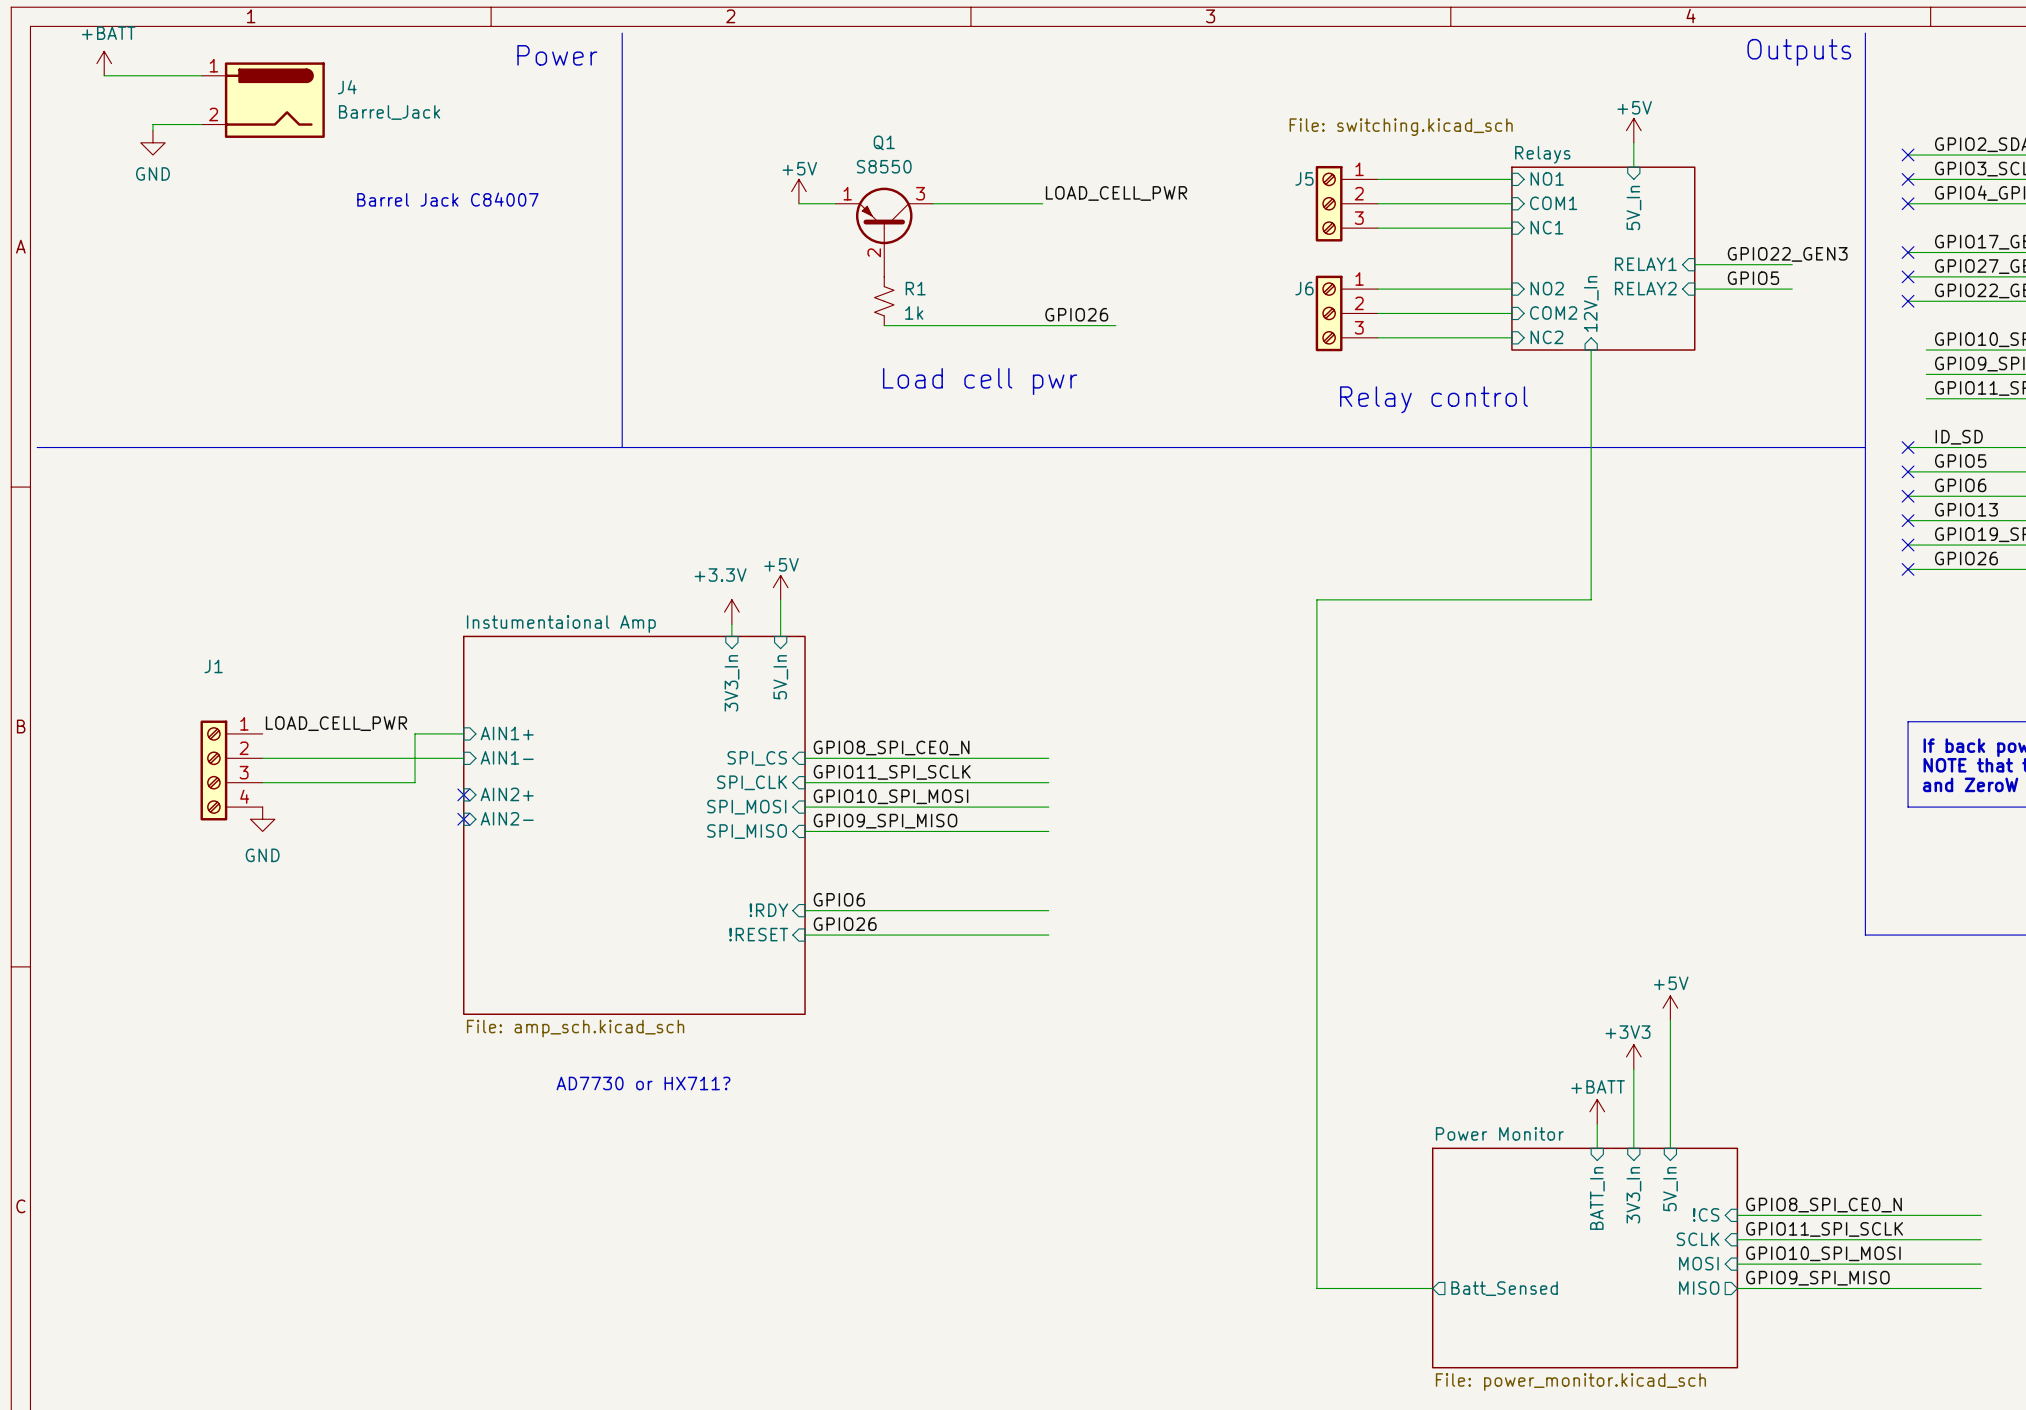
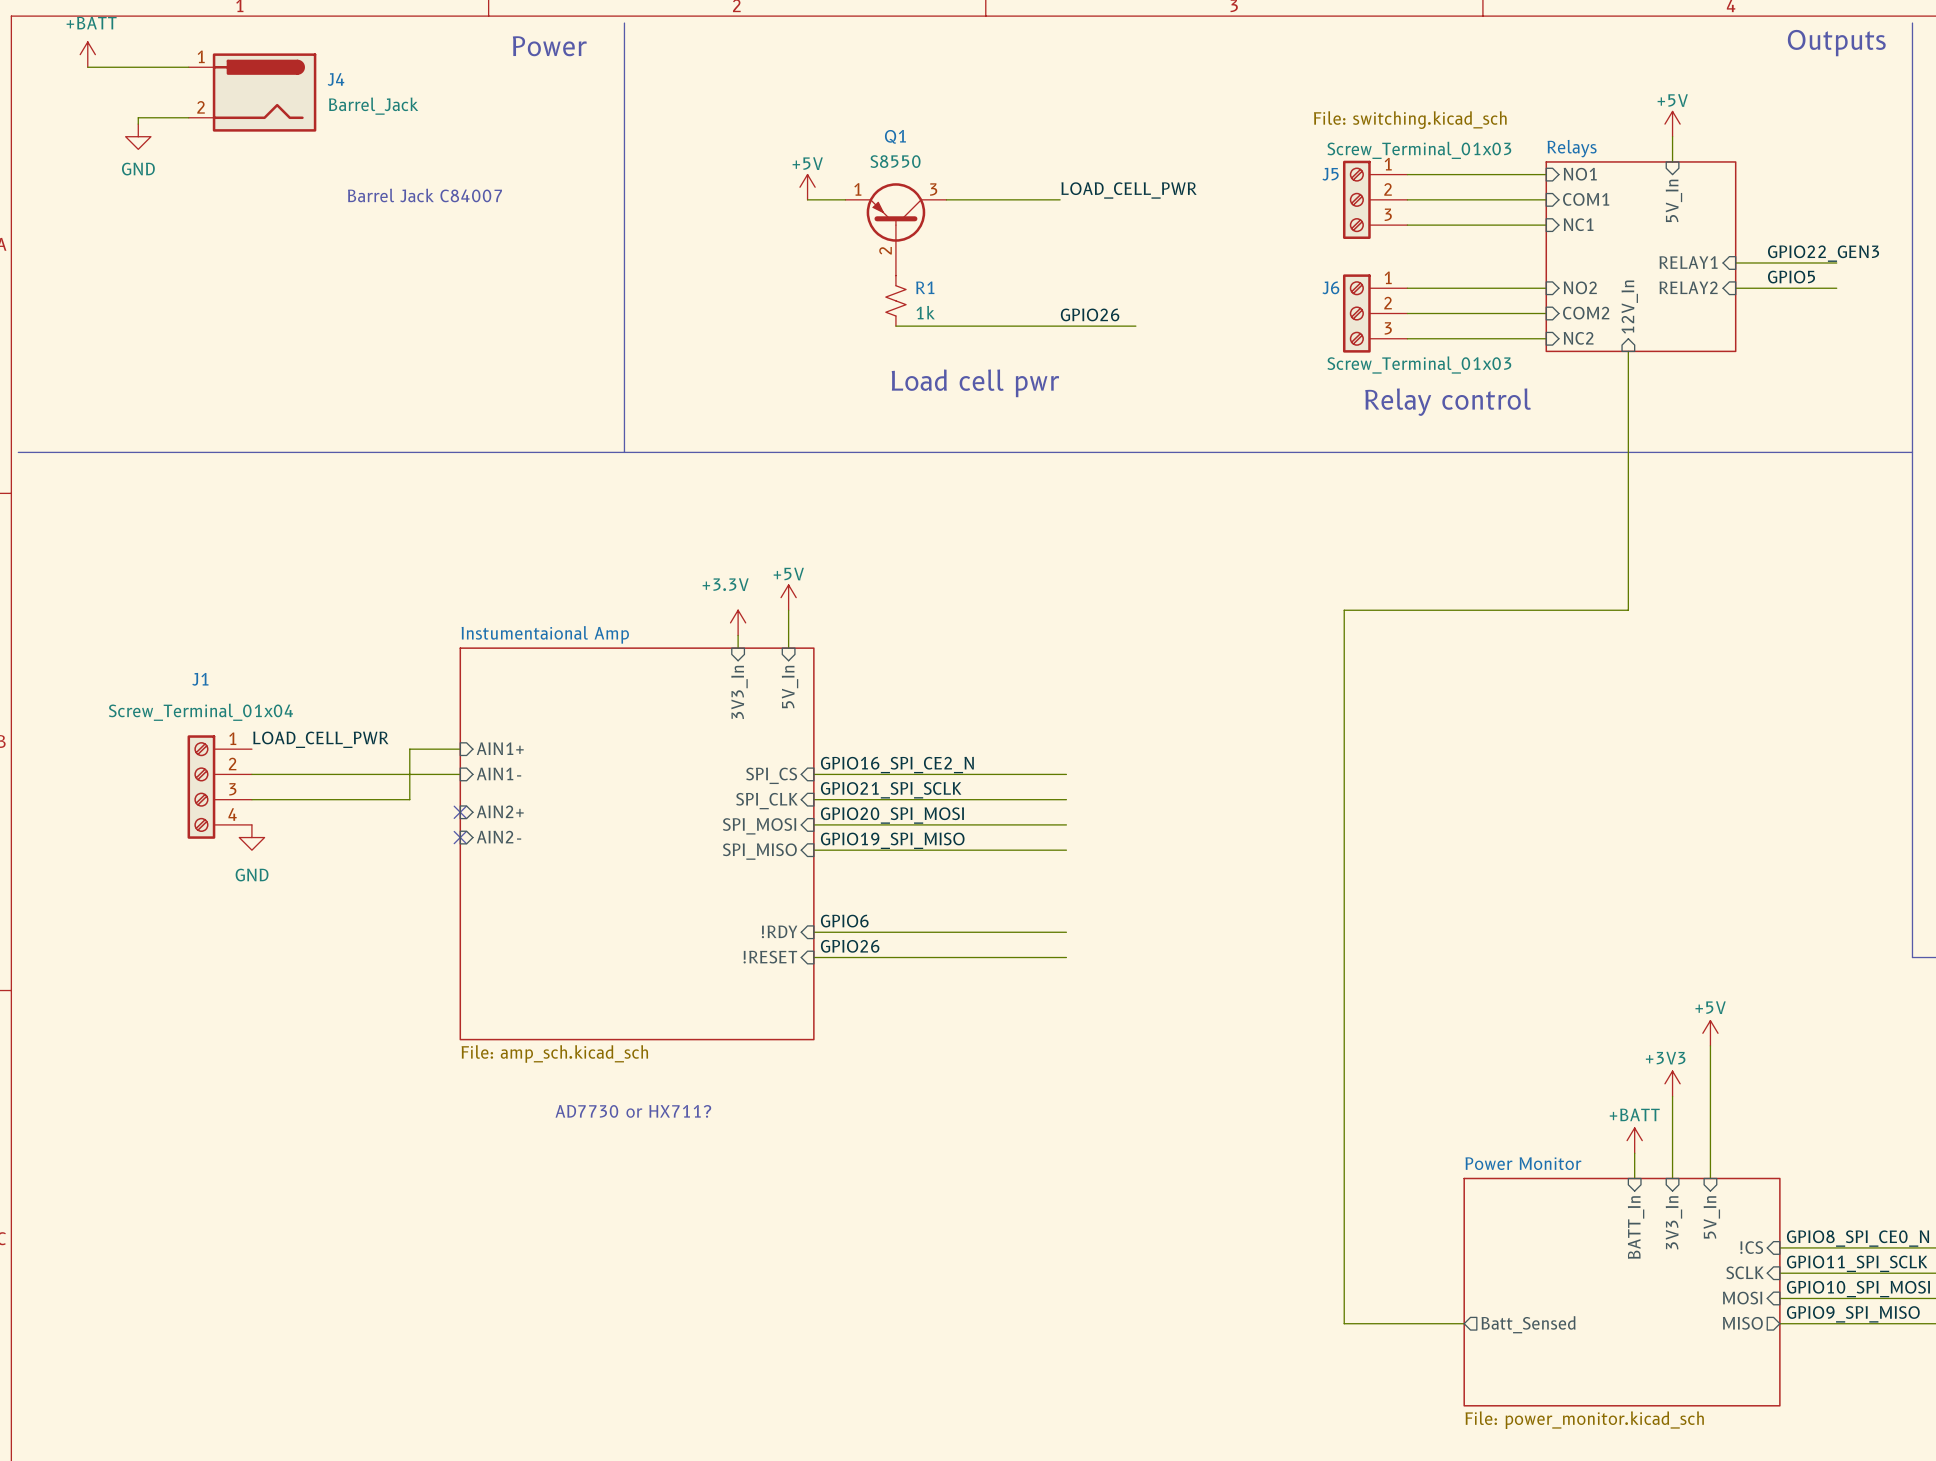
J5 value: none -> Screw_Terminal_01x03 (1419, 150)
J6 value: none -> Screw_Terminal_01x03 (1419, 365)
J1 value: none -> Screw_Terminal_01x04 (200, 712)
label: GPIO8_SPI_CE0_N (891, 748) -> GPIO16_SPI_CE2_N (897, 765)
label: GPIO11_SPI_SCLK (892, 772) -> GPIO21_SPI_SCLK (891, 790)
label: GPIO10_SPI_MOSI (891, 796) -> GPIO20_SPI_MOSI (892, 815)
label: GPIO9_SPI_MISO (885, 821) -> GPIO19_SPI_MISO (892, 840)

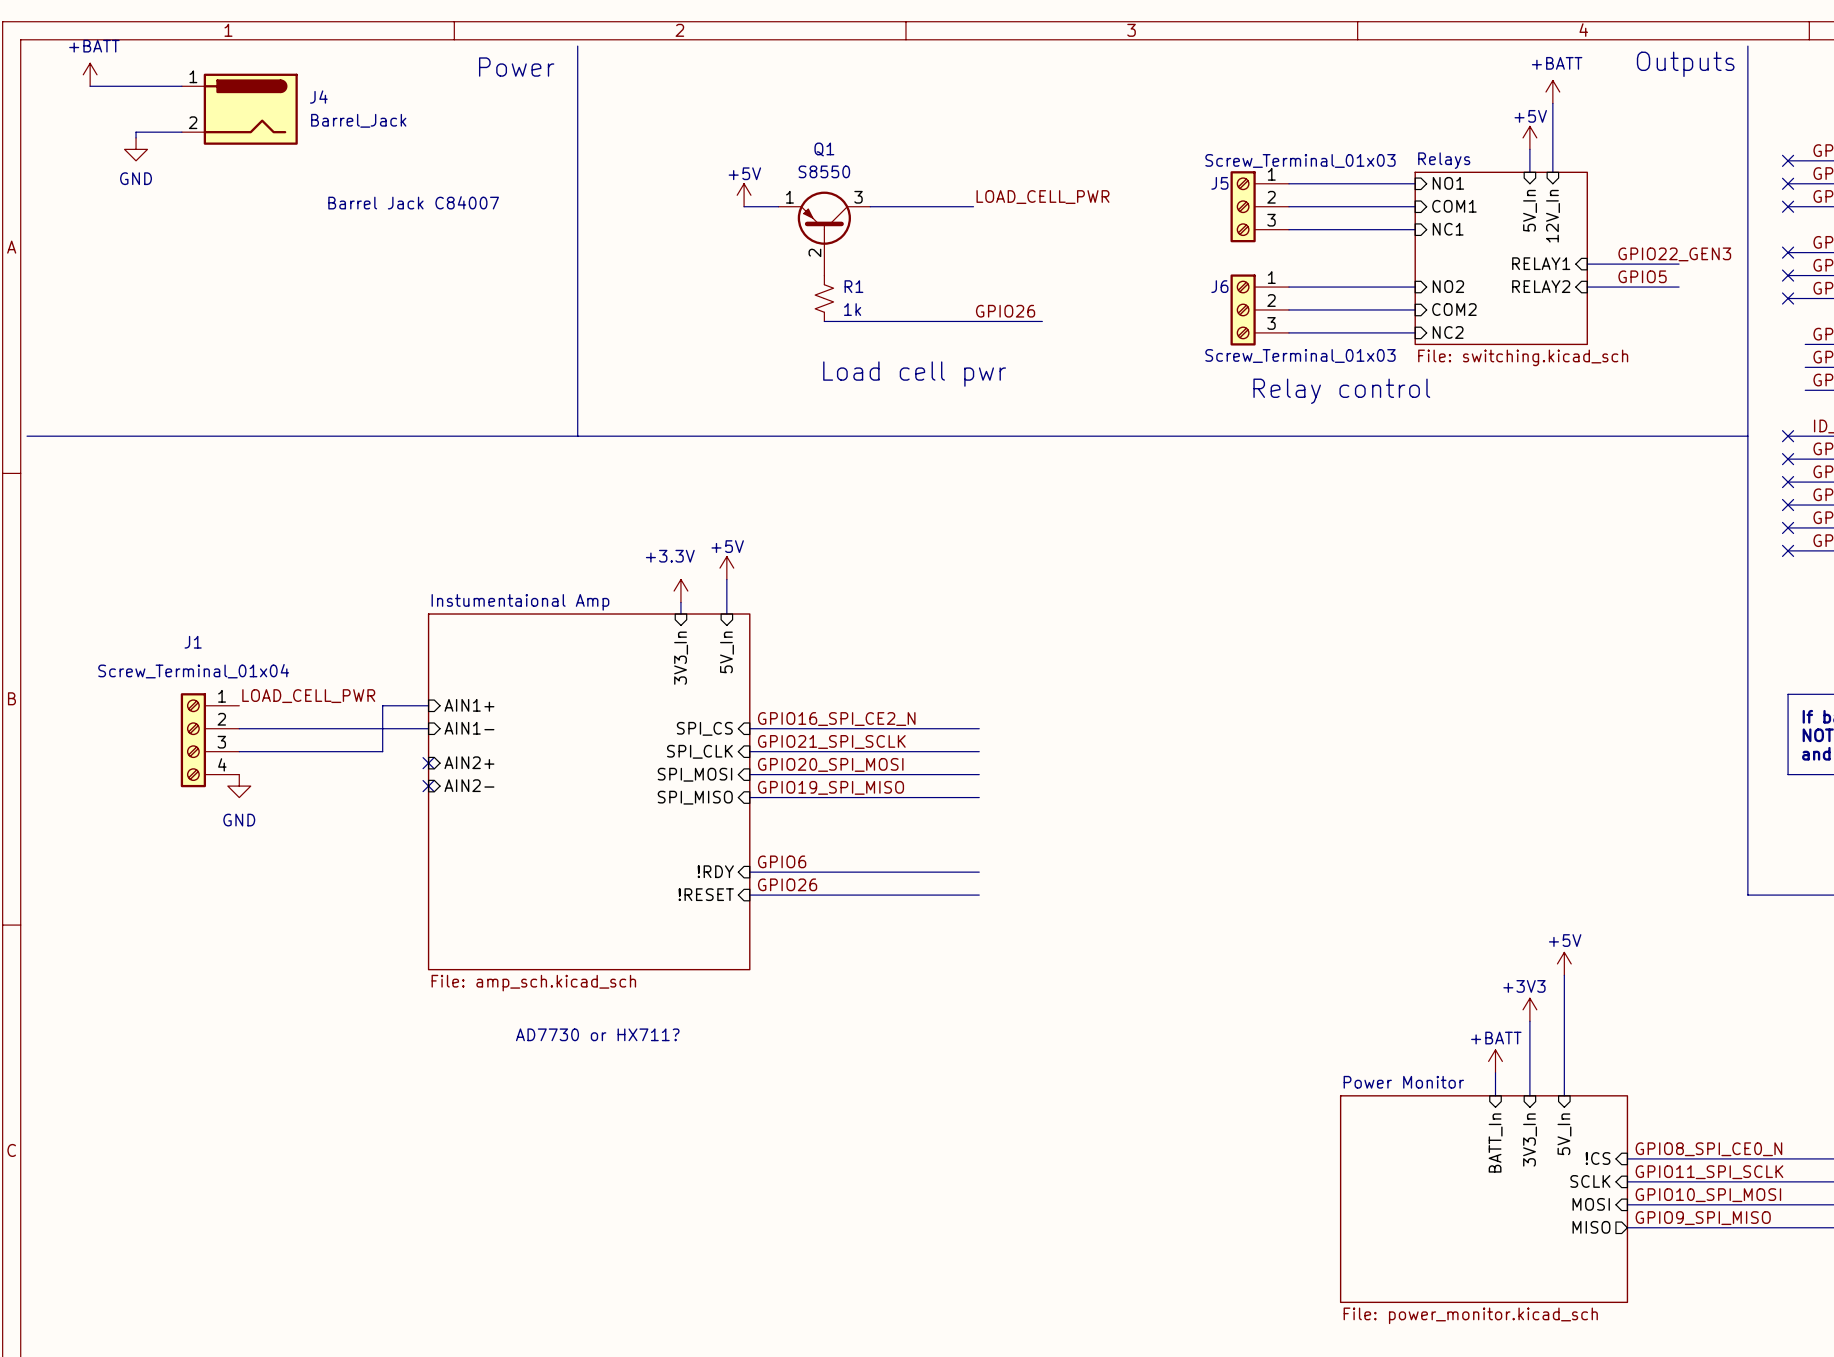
power symbol: none -> +BATT (1552, 92)
wire: none -> (1552, 103) (1552, 172)
sheet Relays value position: File: switching.kicad_sch (1410, 120) -> File: switching.kicad_sch (1523, 357)
sheet pin rotation: 0° (1629, 307) -> 180° (1552, 216)
sheet pin position: 12V_In (1629, 307) -> 12V_In (1552, 216)
wire: (1628, 351) (1628, 610) (1344, 610) (1344, 1323) (1464, 1323) -> none
sheet pin: Batt_Sensed (1528, 1324) -> none

